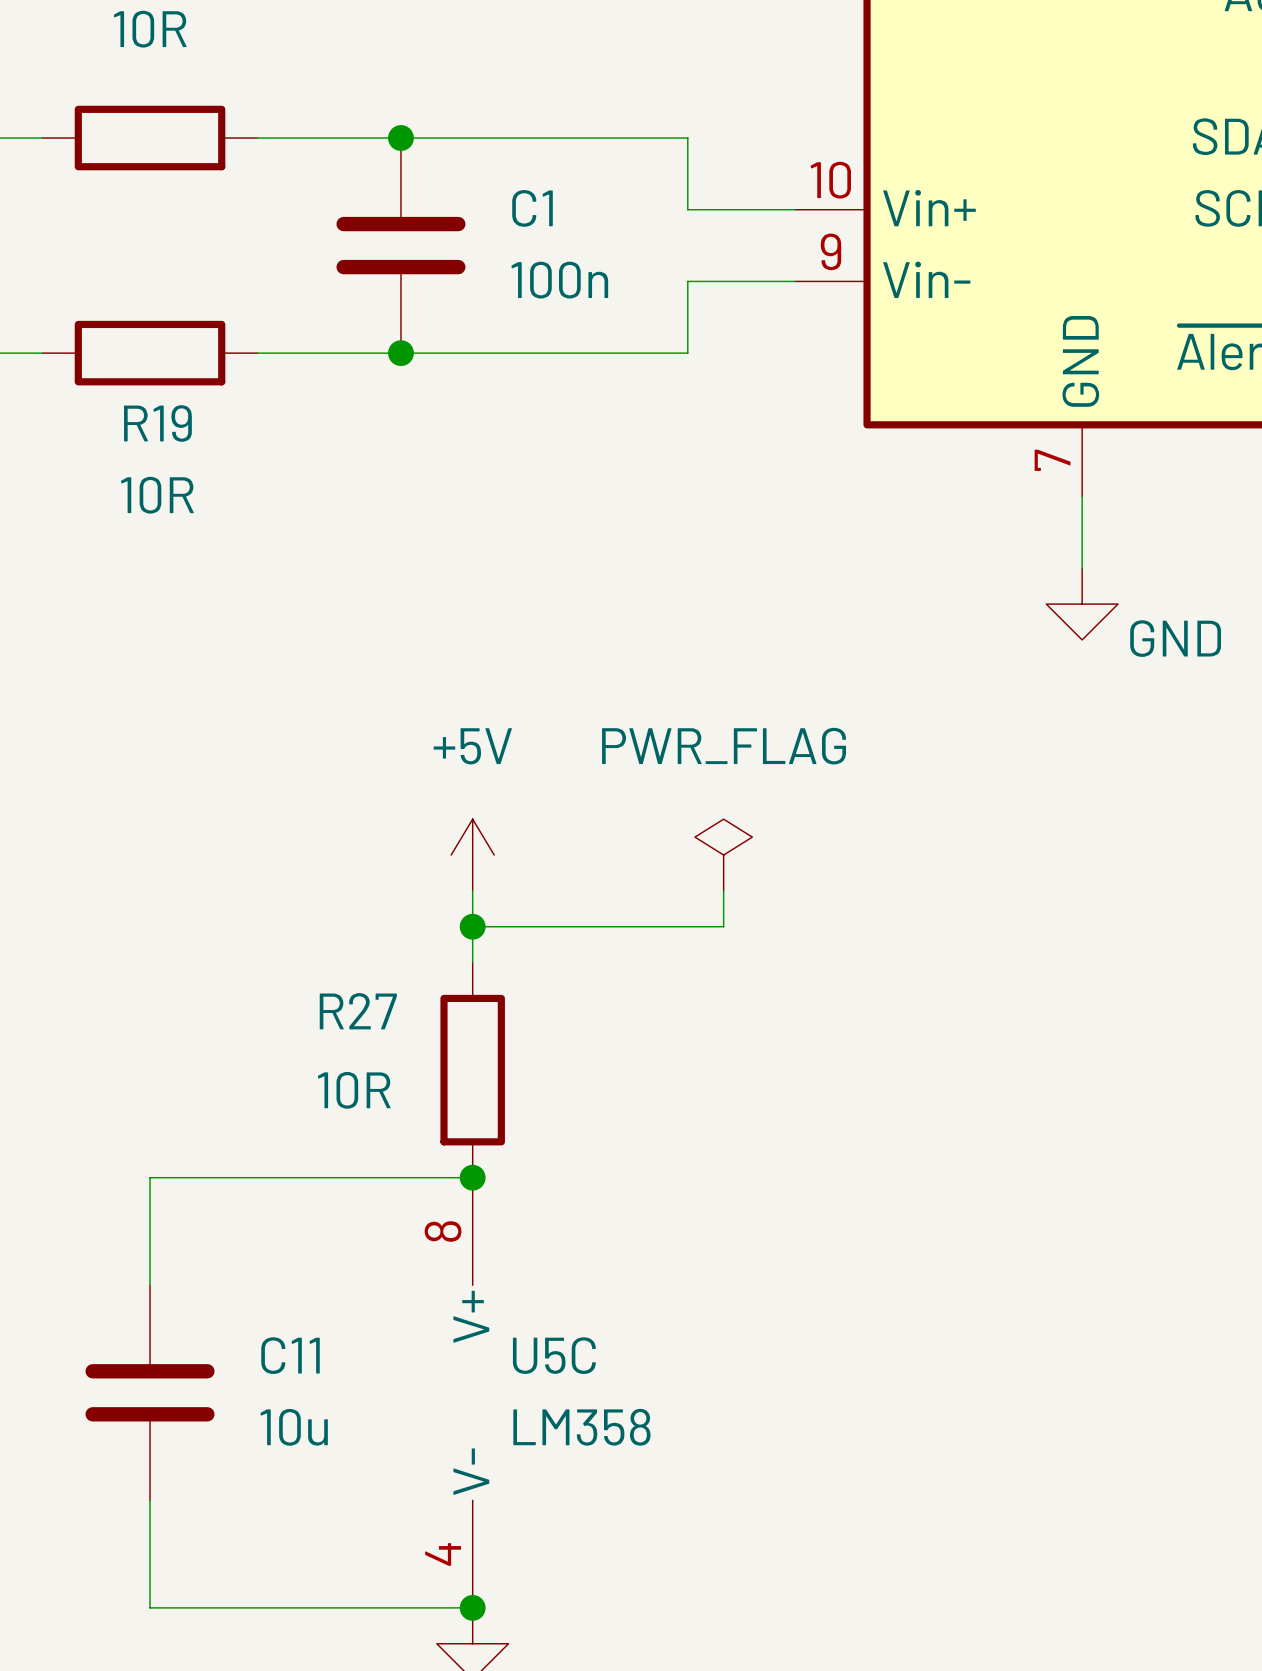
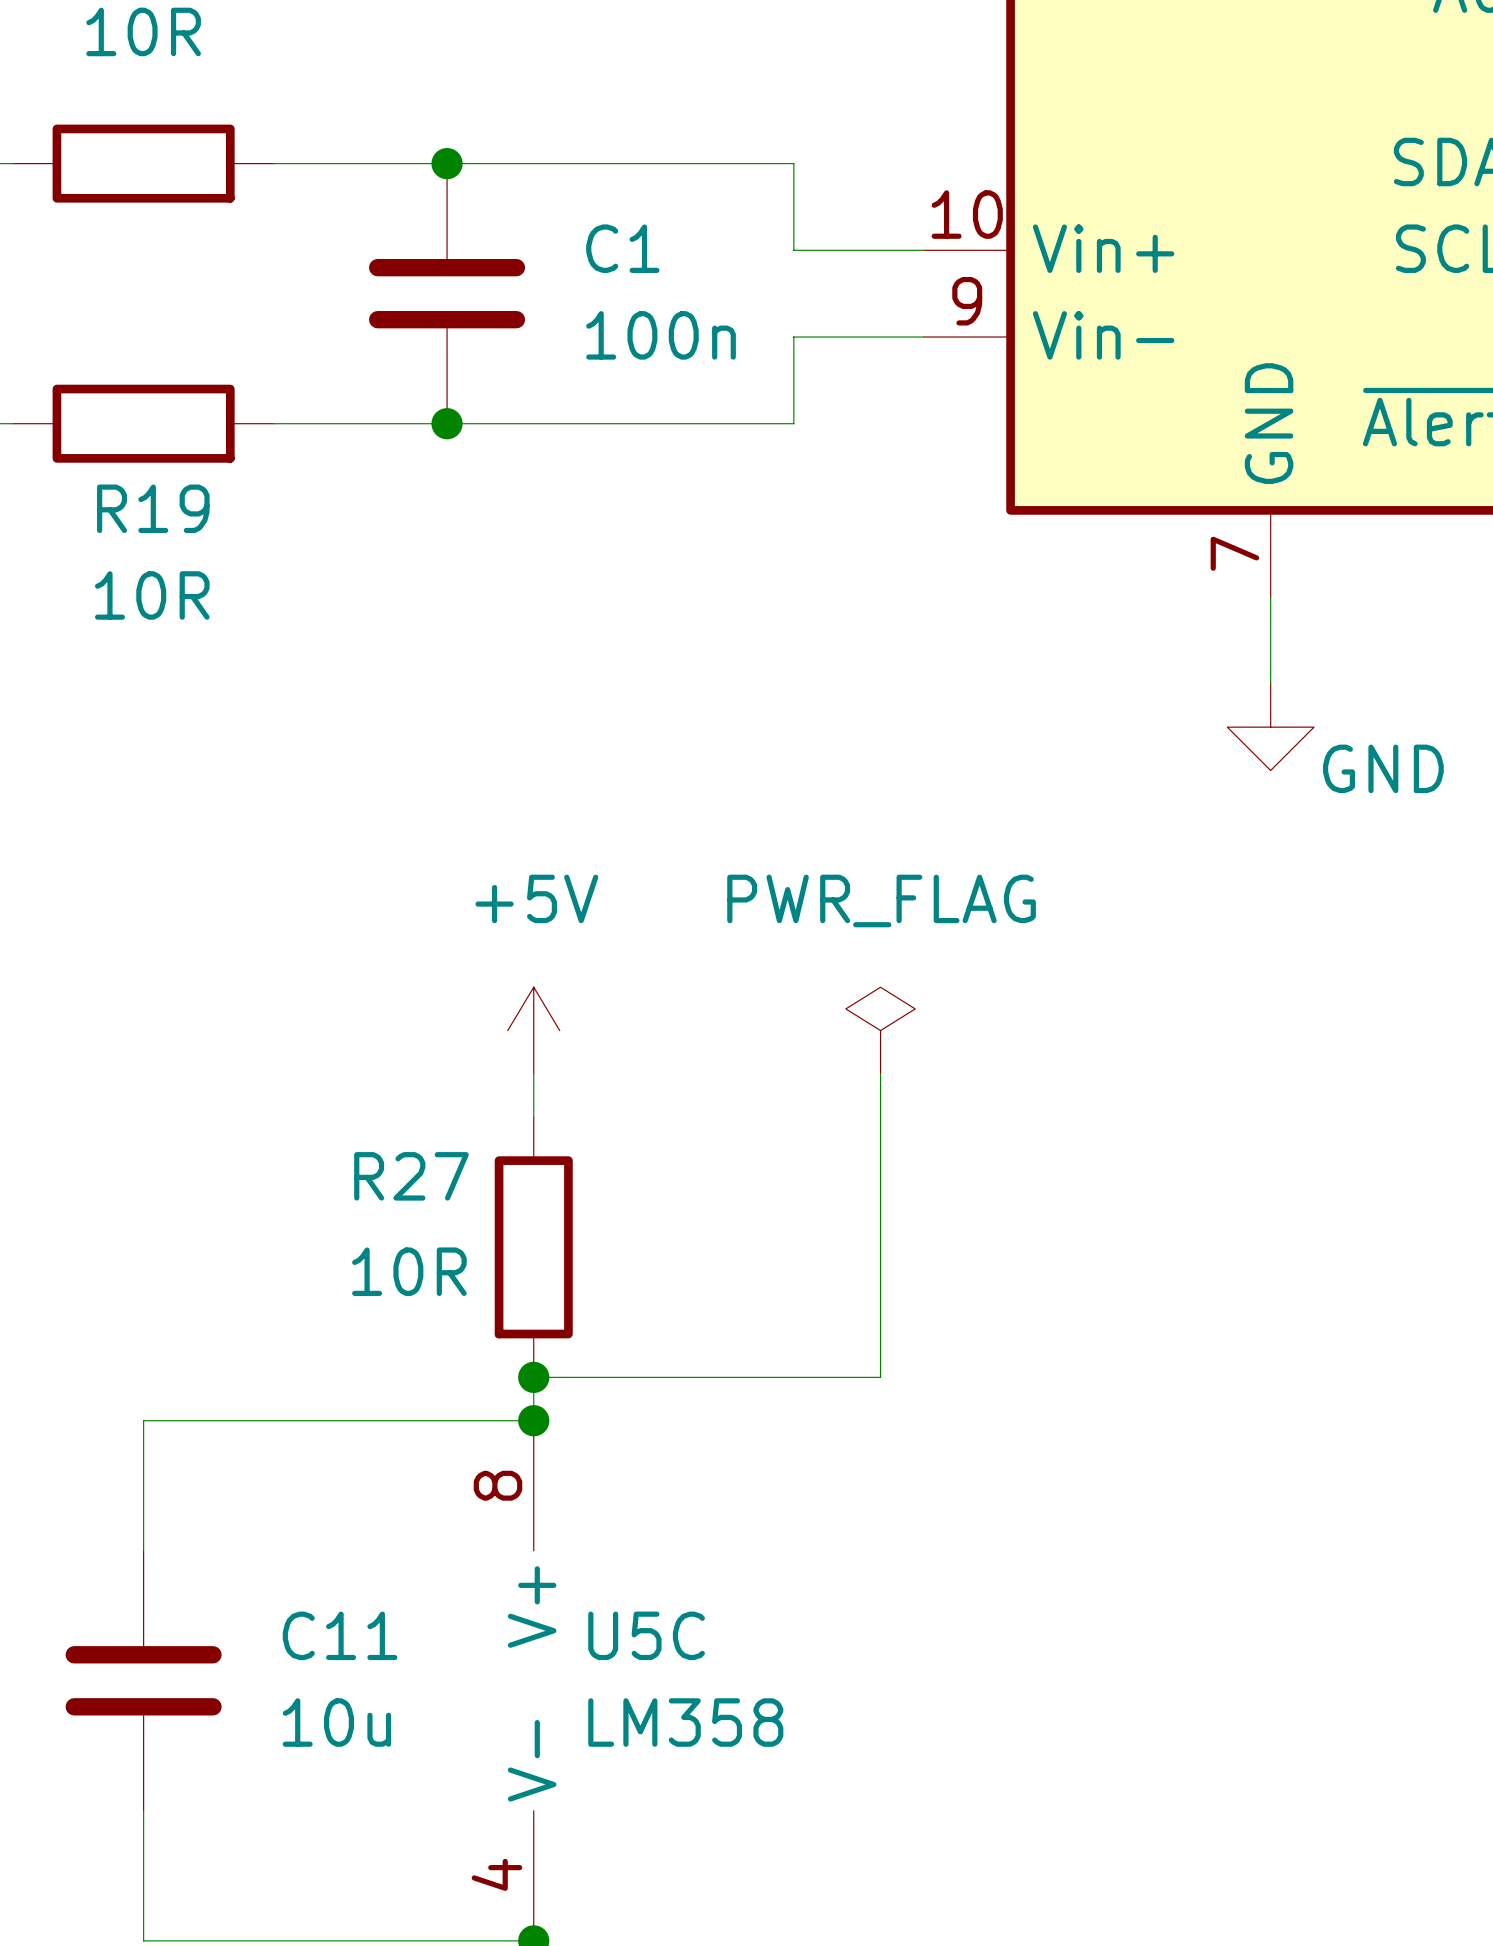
power symbol position: PWR_FLAG (723, 855) -> PWR_FLAG (880, 1030)
wire: (723, 890) (723, 926) (472, 926) (472, 962) -> none
wire: none -> (880, 1073) (880, 1377) (533, 1377) (533, 1420)
junction: (472, 926) -> none
R27 position: (472, 1070) -> (533, 1247)
junction: none -> (533, 1377)

